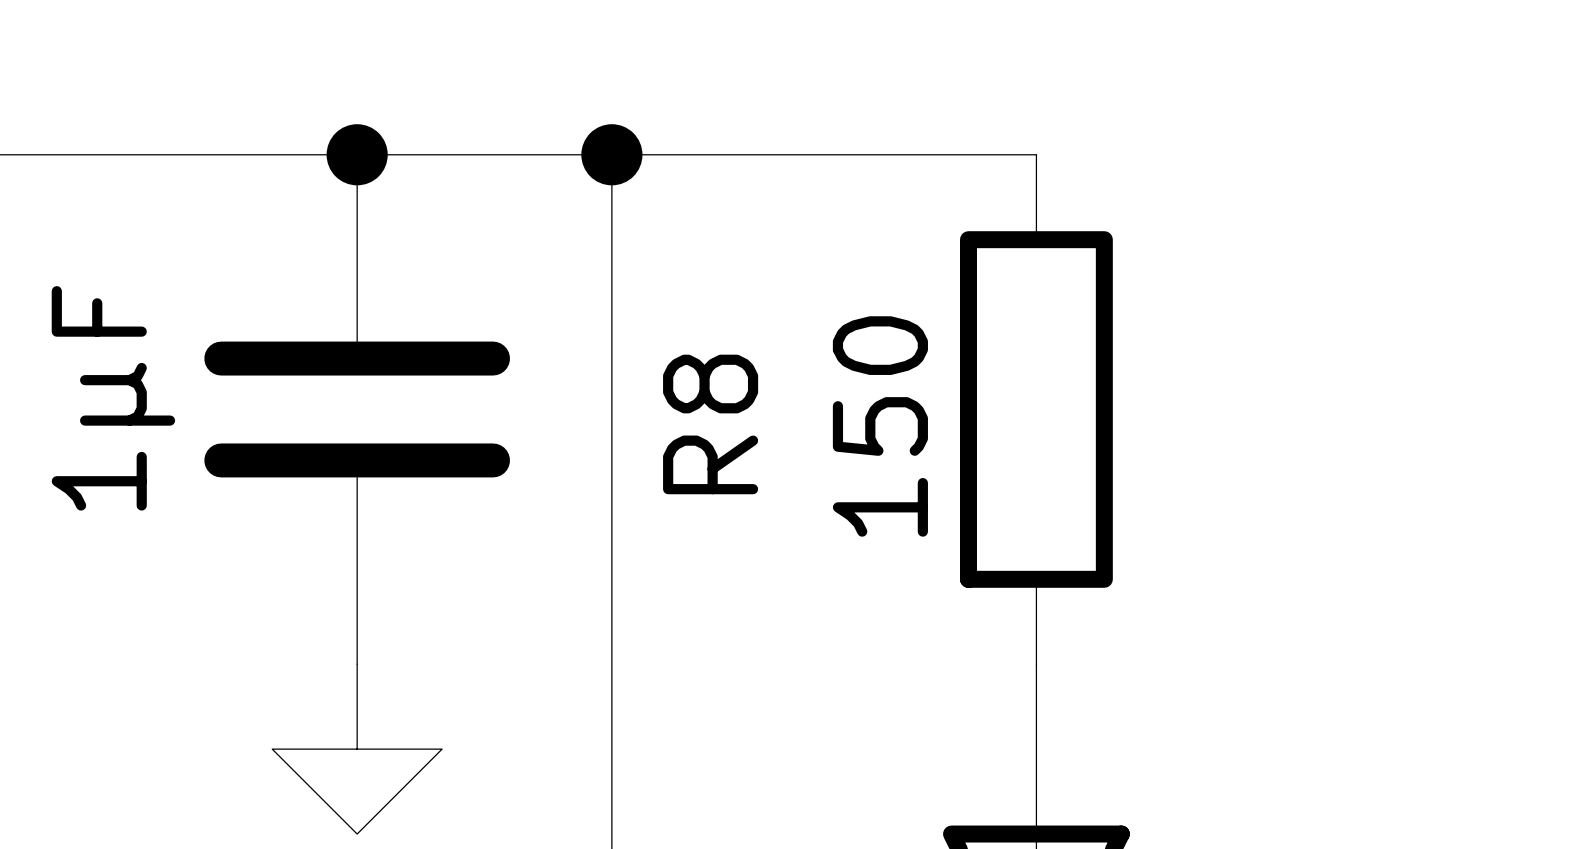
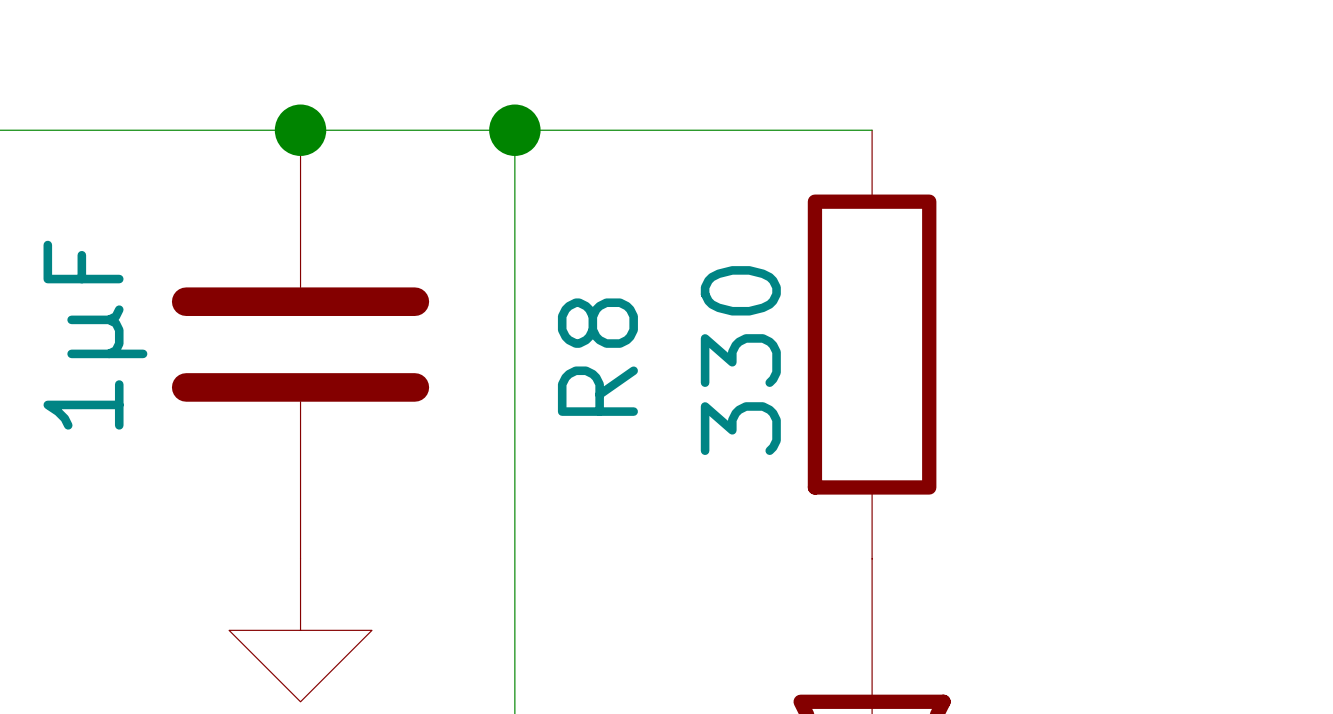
R8 value: 150 (880, 426) -> 330 (740, 360)

